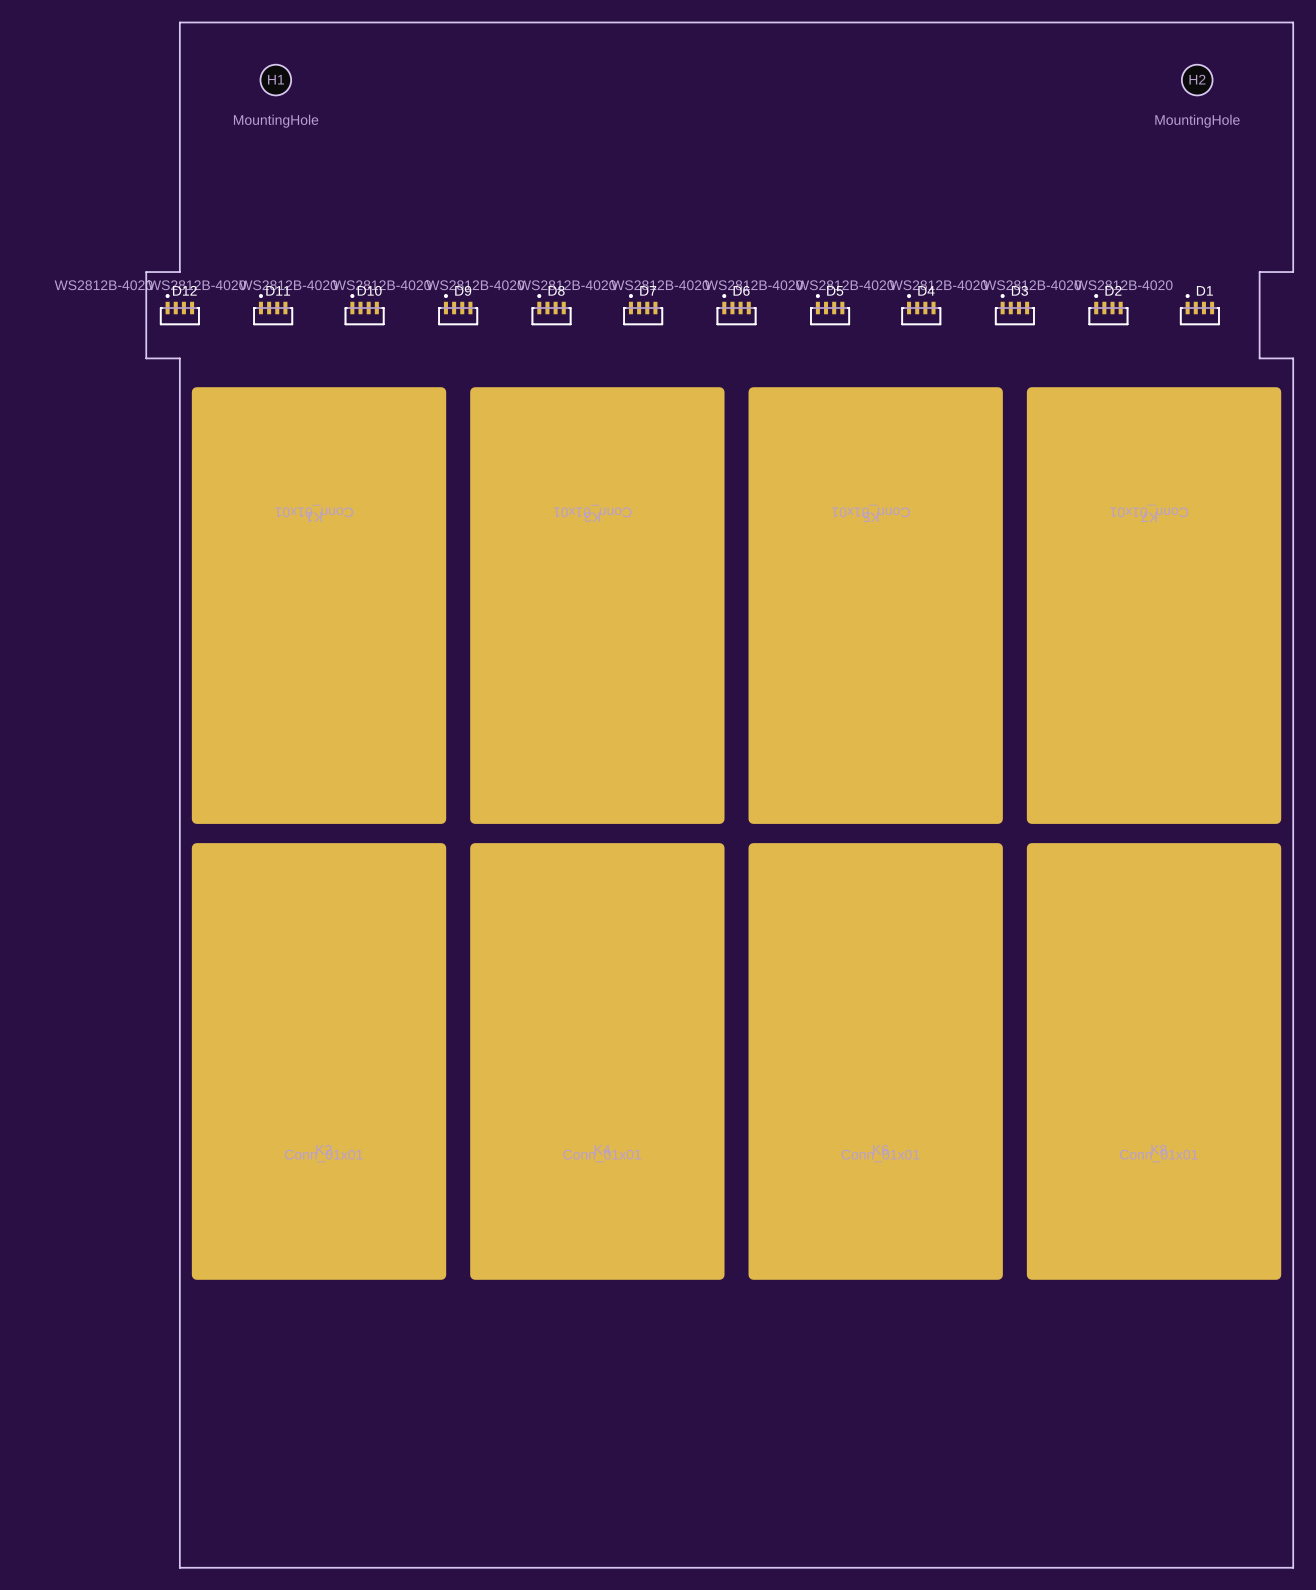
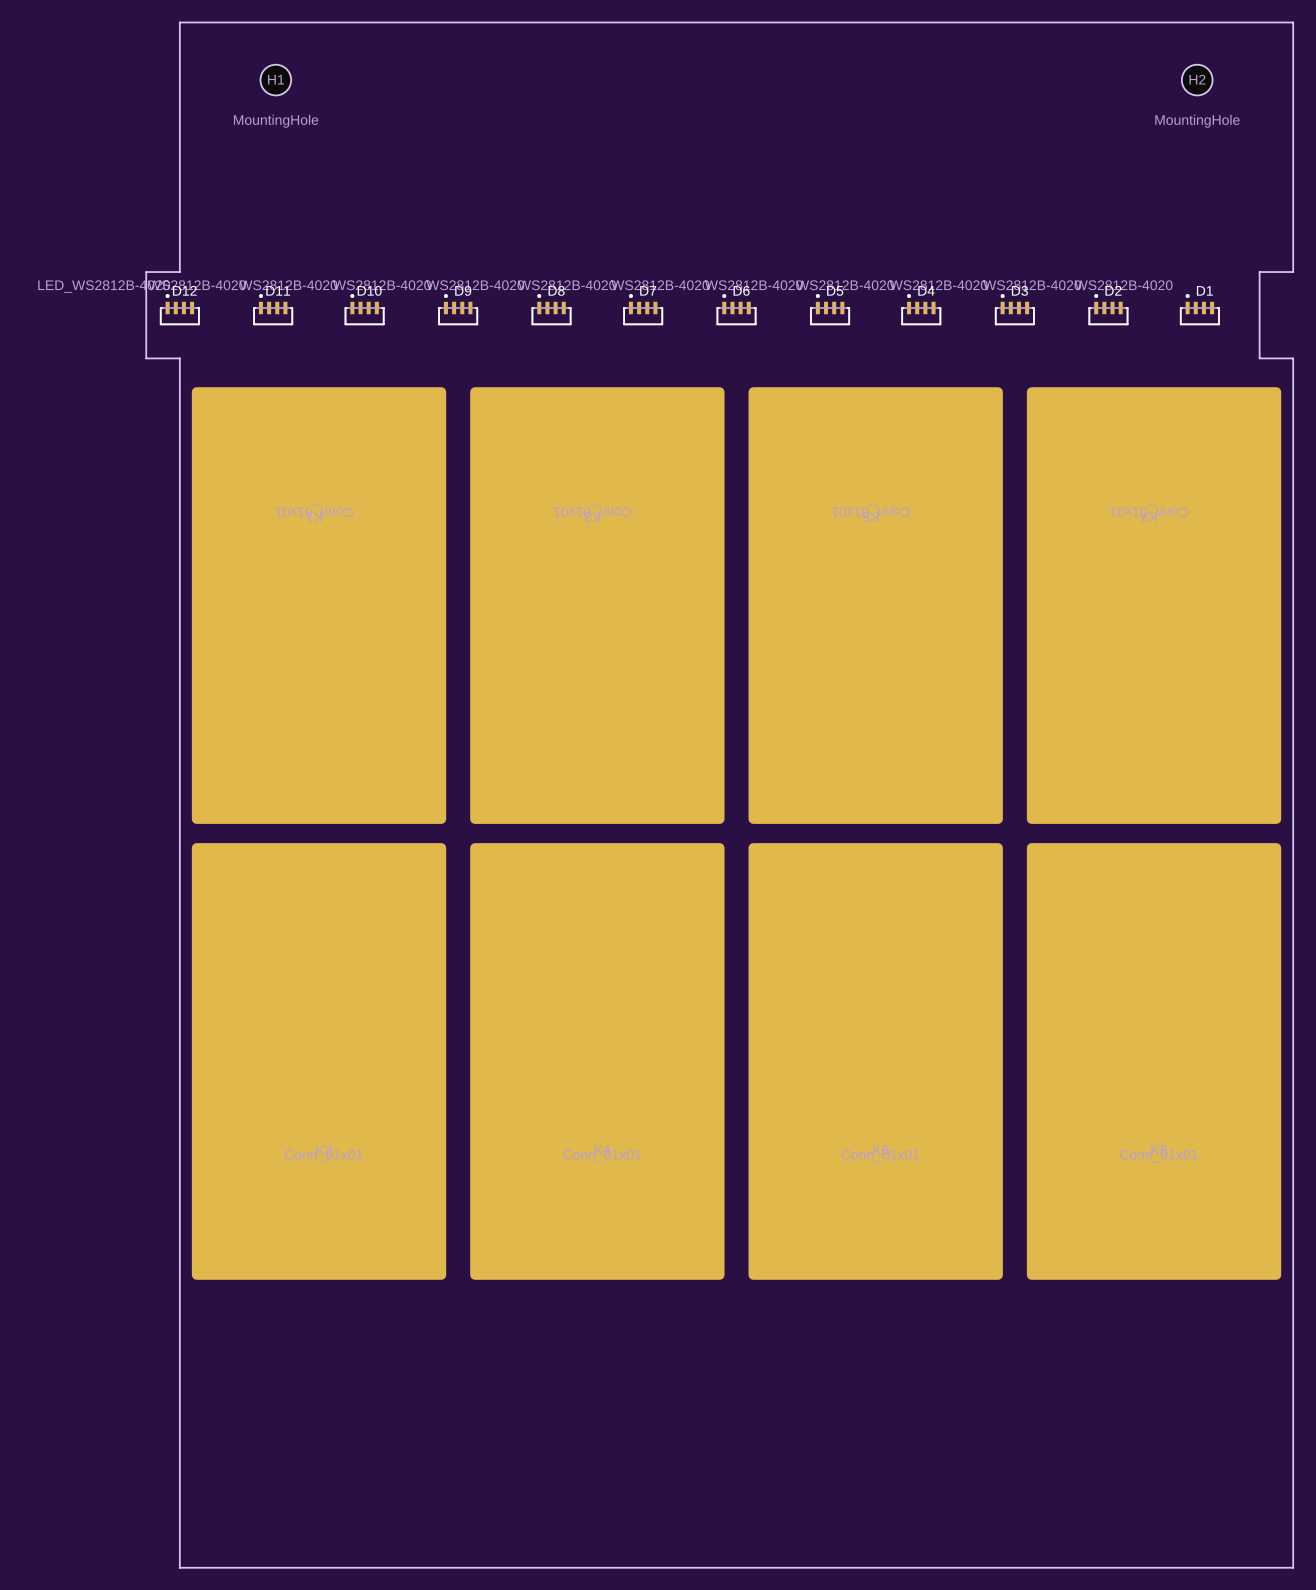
D12 value: WS2812B-4020 (103, 285) -> LED_WS2812B-4020 (104, 286)

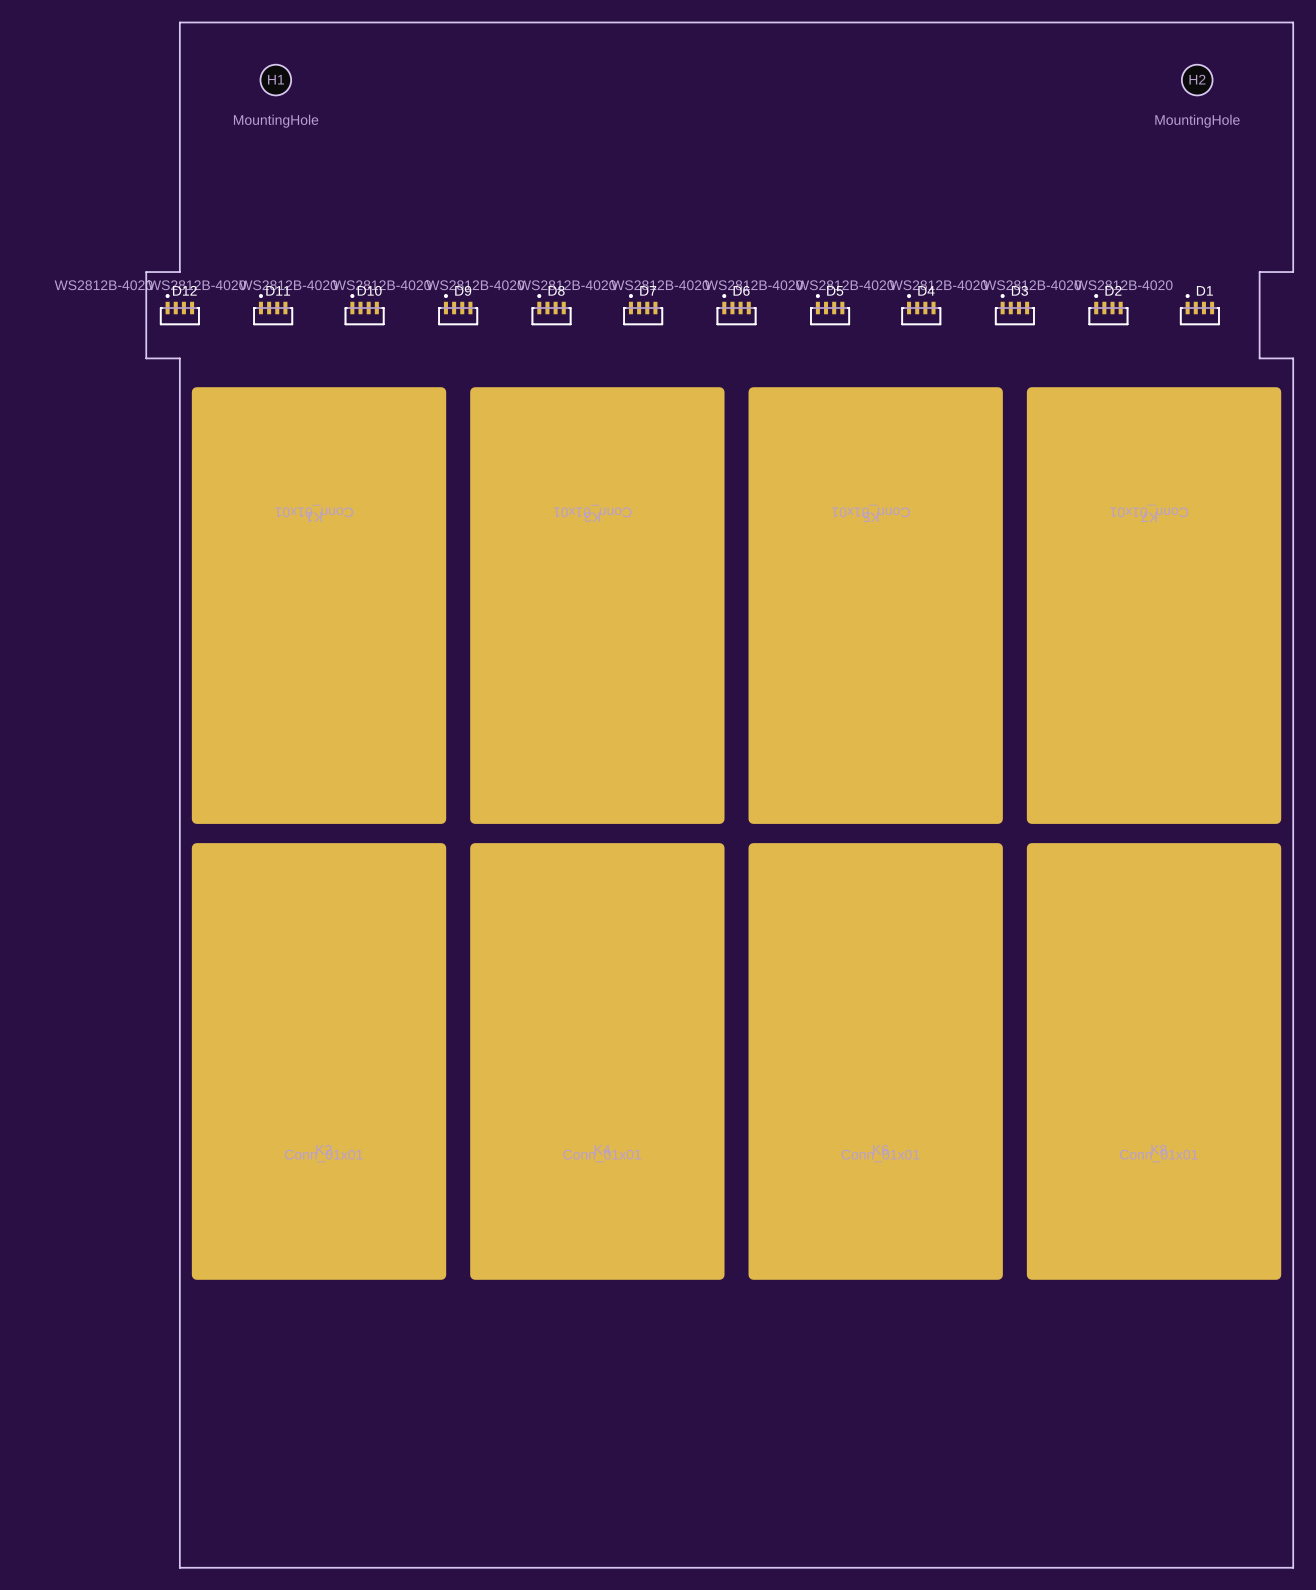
D12 value: LED_WS2812B-4020 (104, 286) -> WS2812B-4020 (103, 285)

